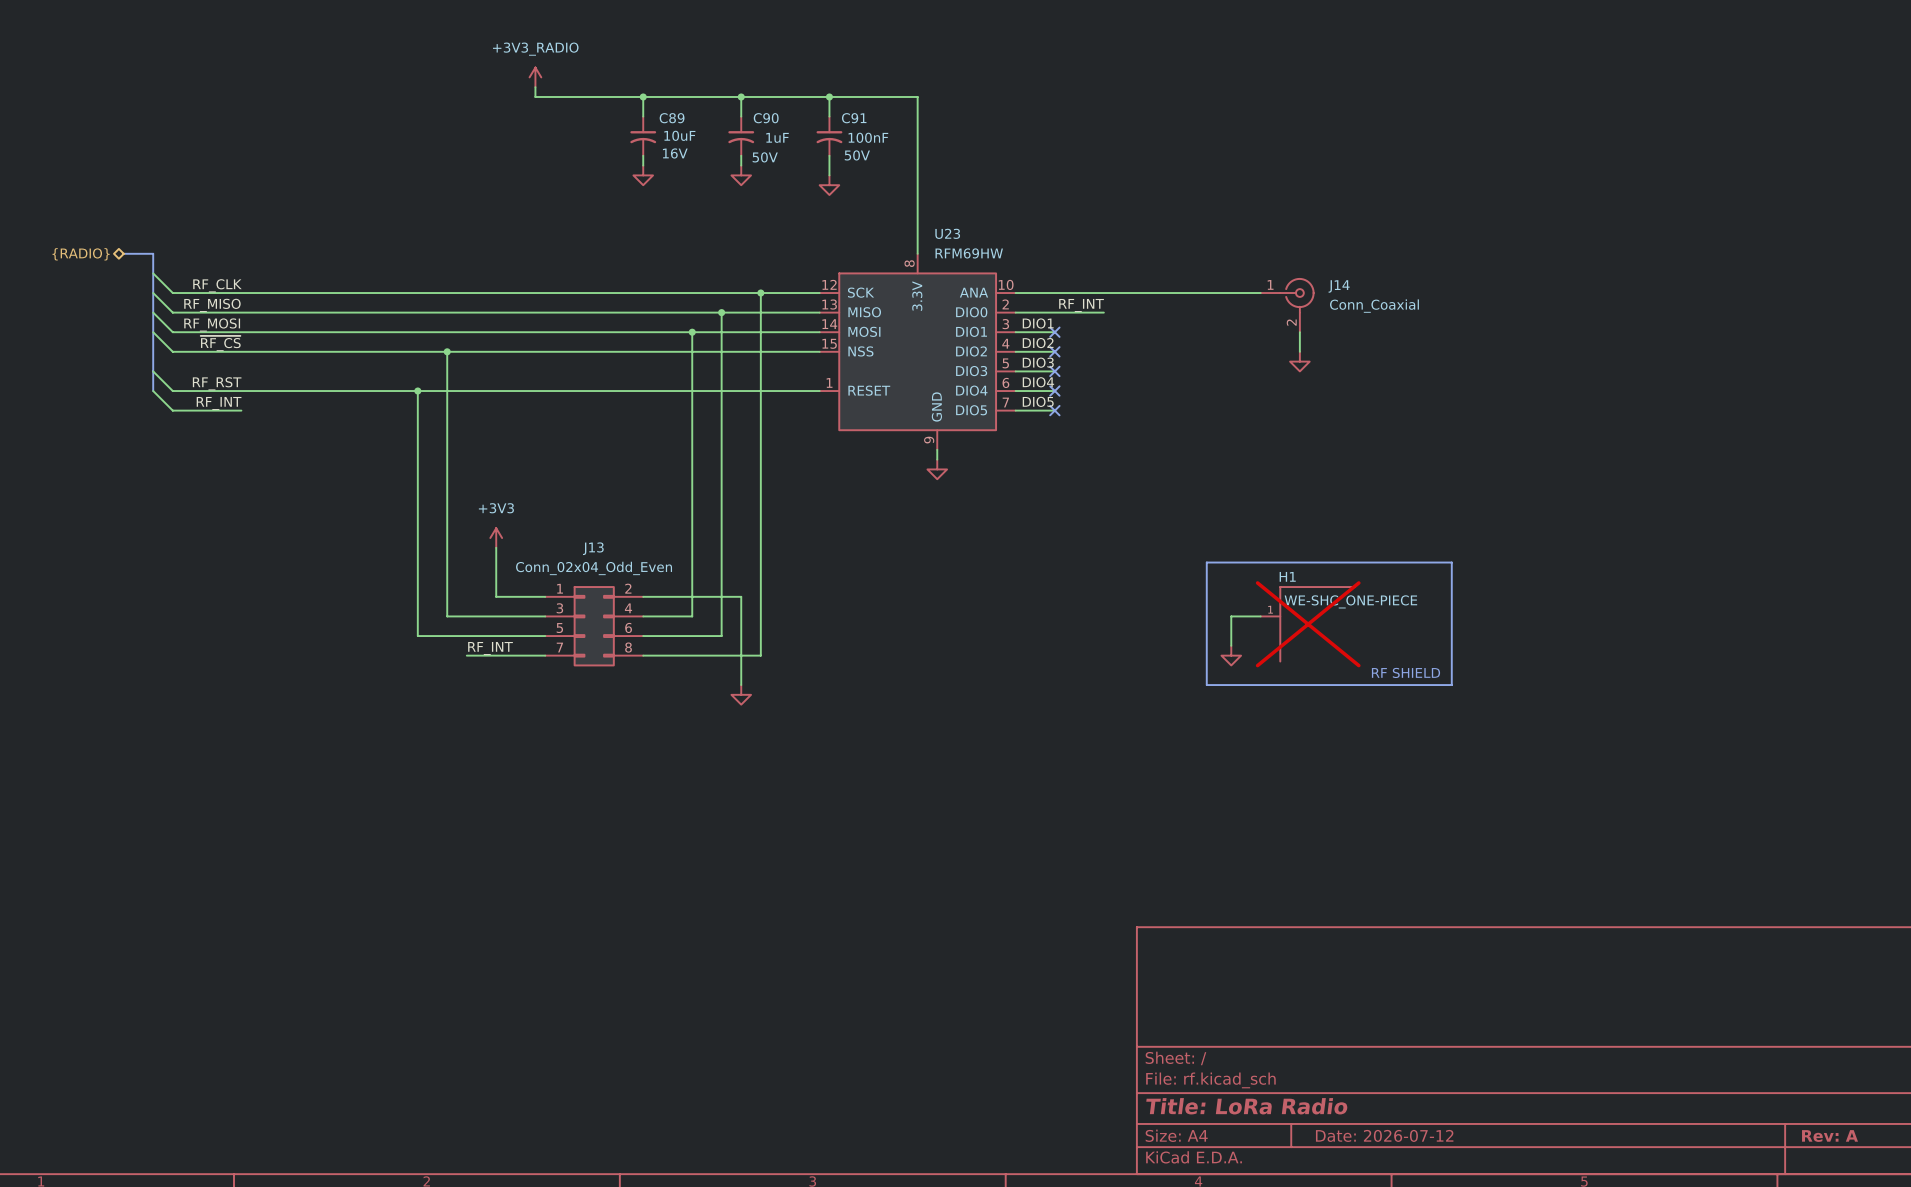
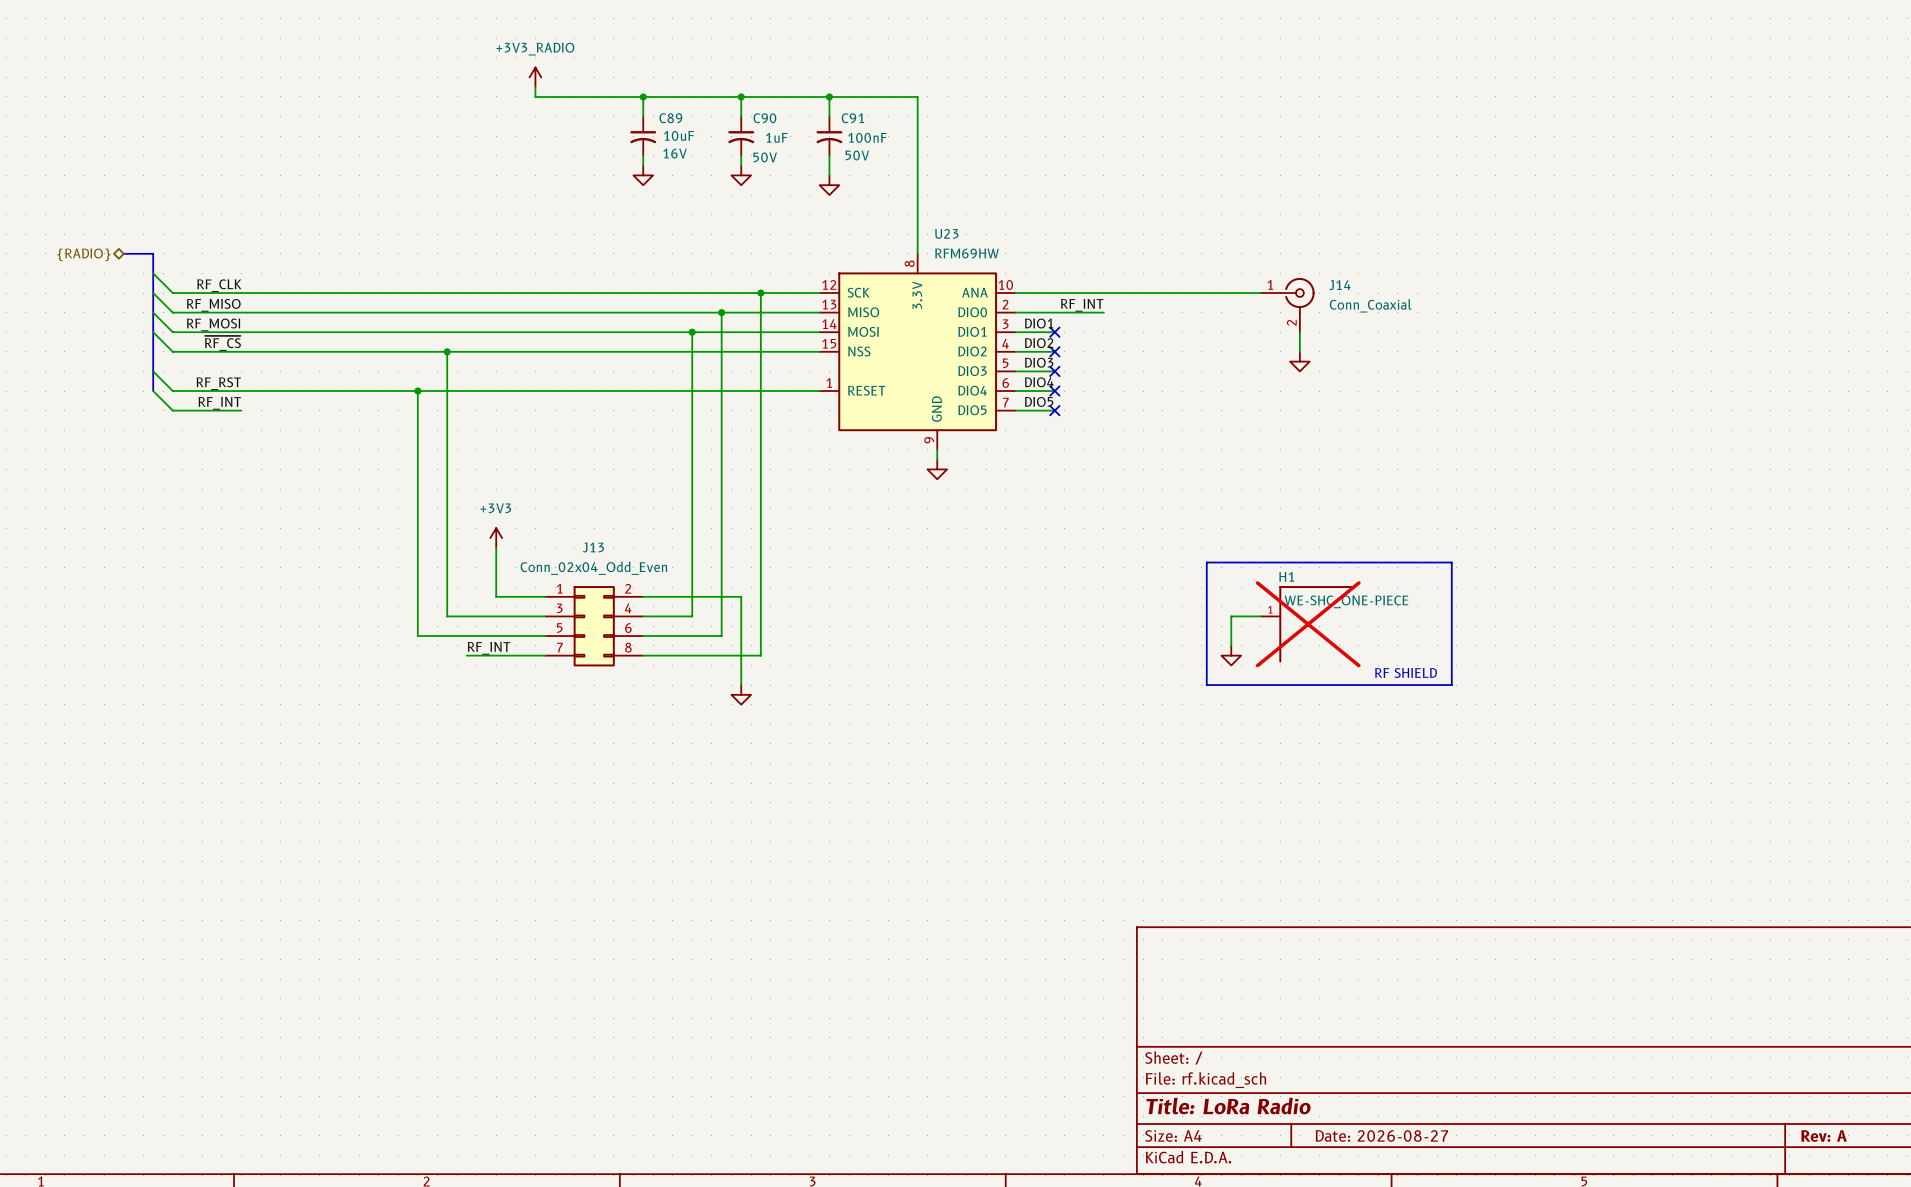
title block: Date: 2026-07-12 (1384, 1135) -> Date: 2026-08-27 (1381, 1135)

